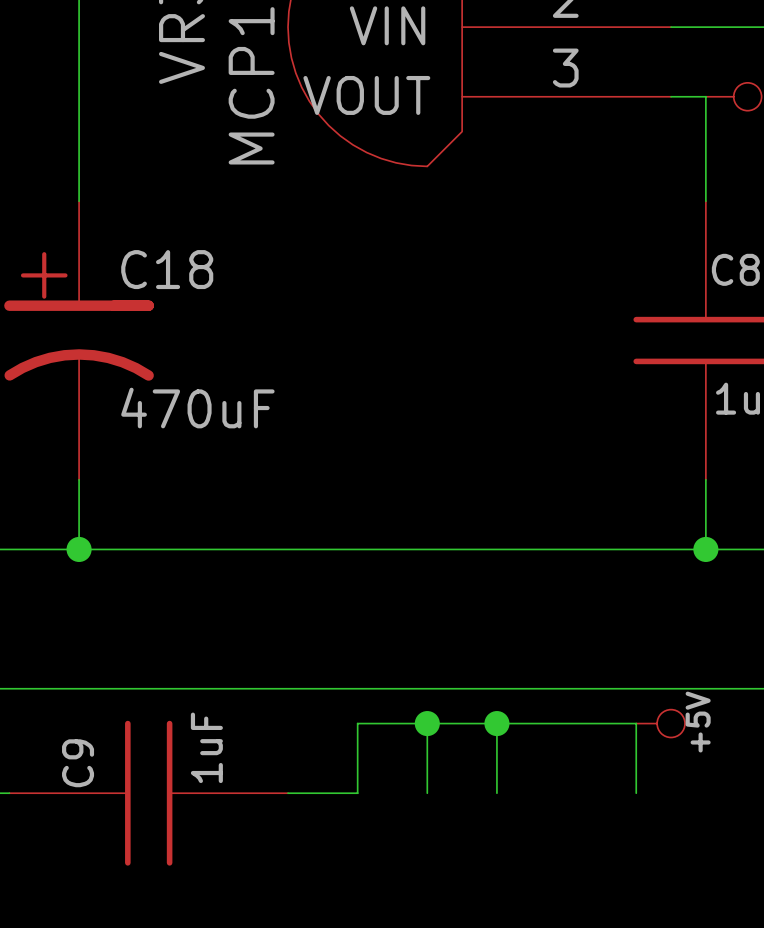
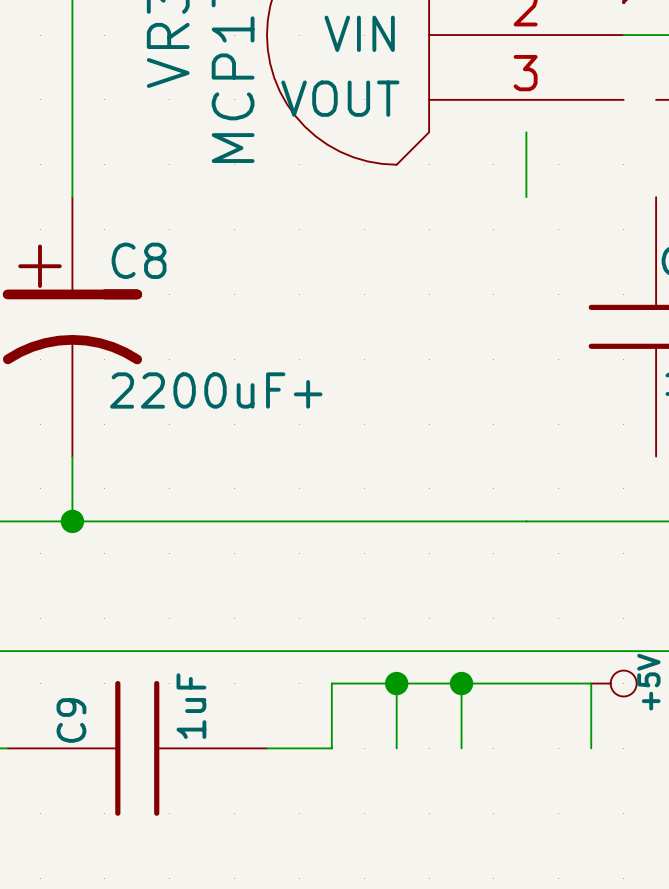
wire: (671, 96) (705, 96) (705, 201) -> none
C18 name: C18 (167, 269) -> C8 (139, 260)
C18 value: 470uF (197, 408) -> 2200uF+ (216, 390)
wire: (705, 479) (705, 549) -> (526, 132) (526, 197)
junction: (705, 549) -> none

